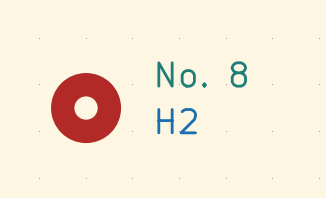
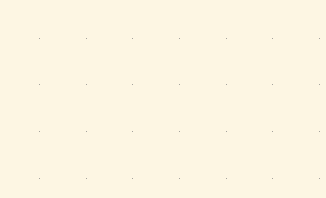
H2: No. 8 (86, 108) -> none

